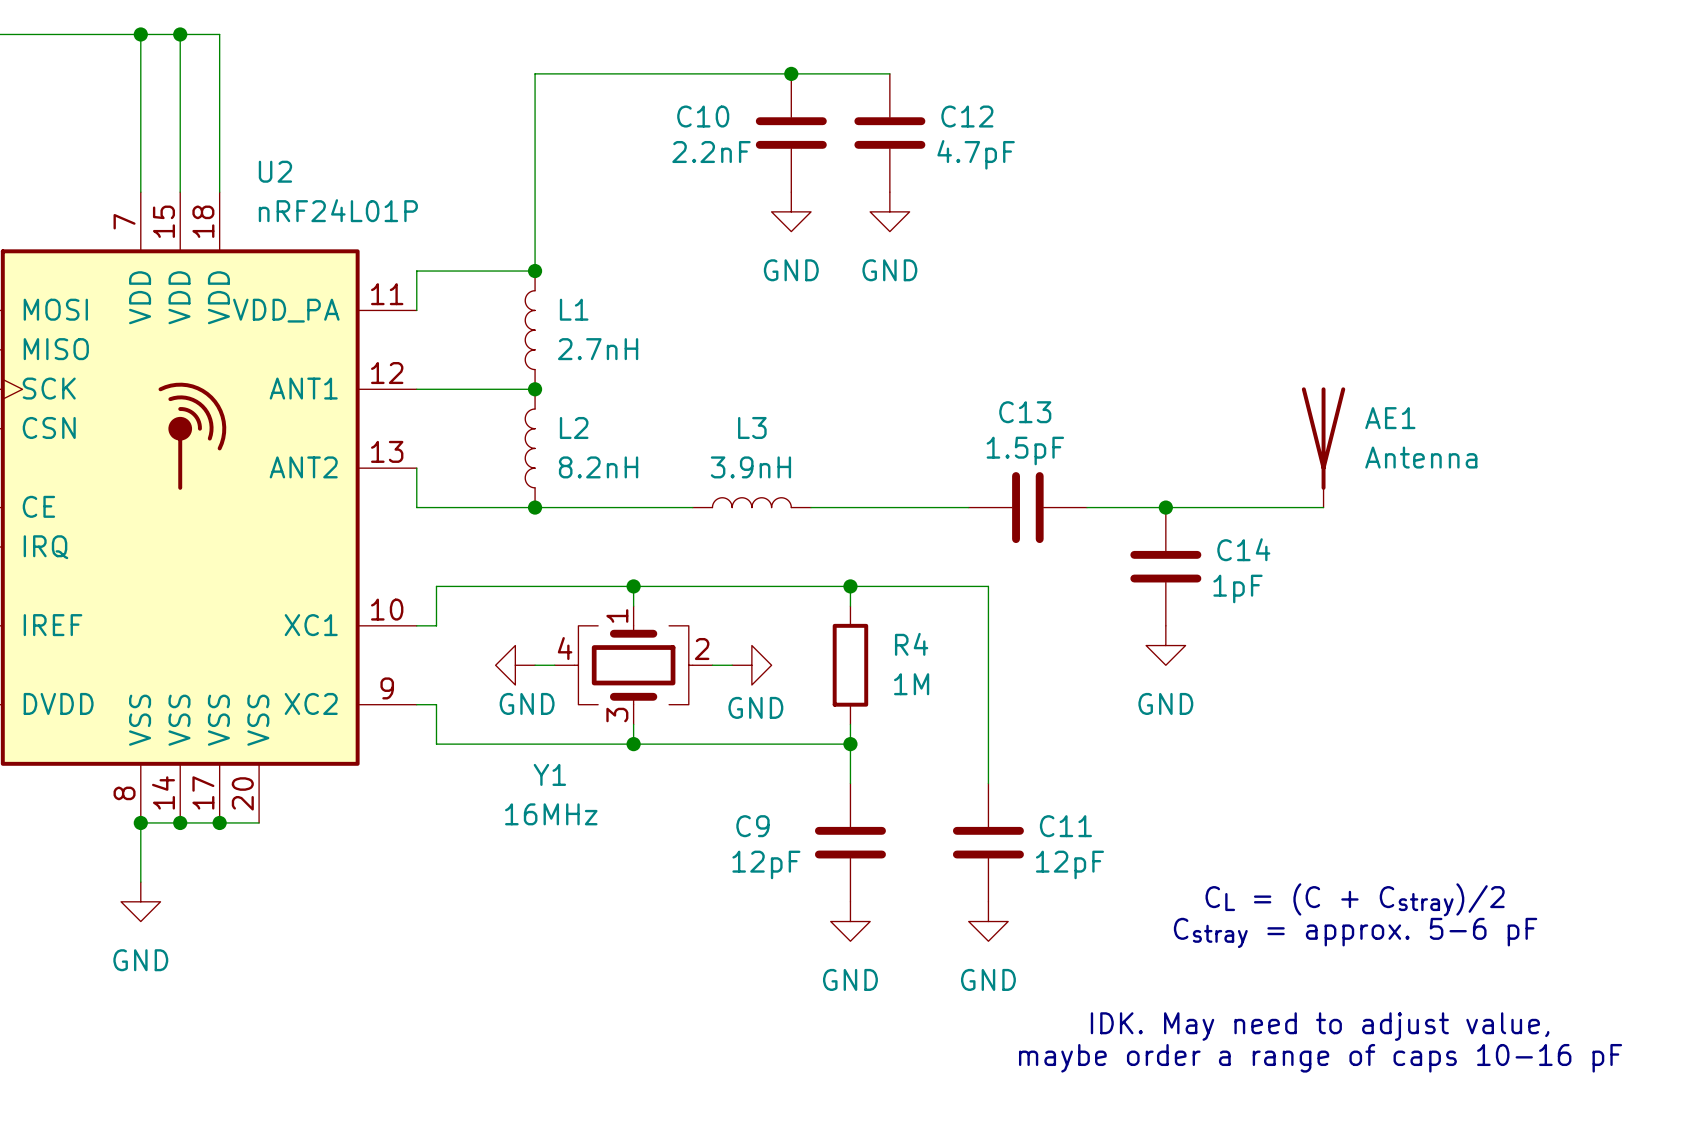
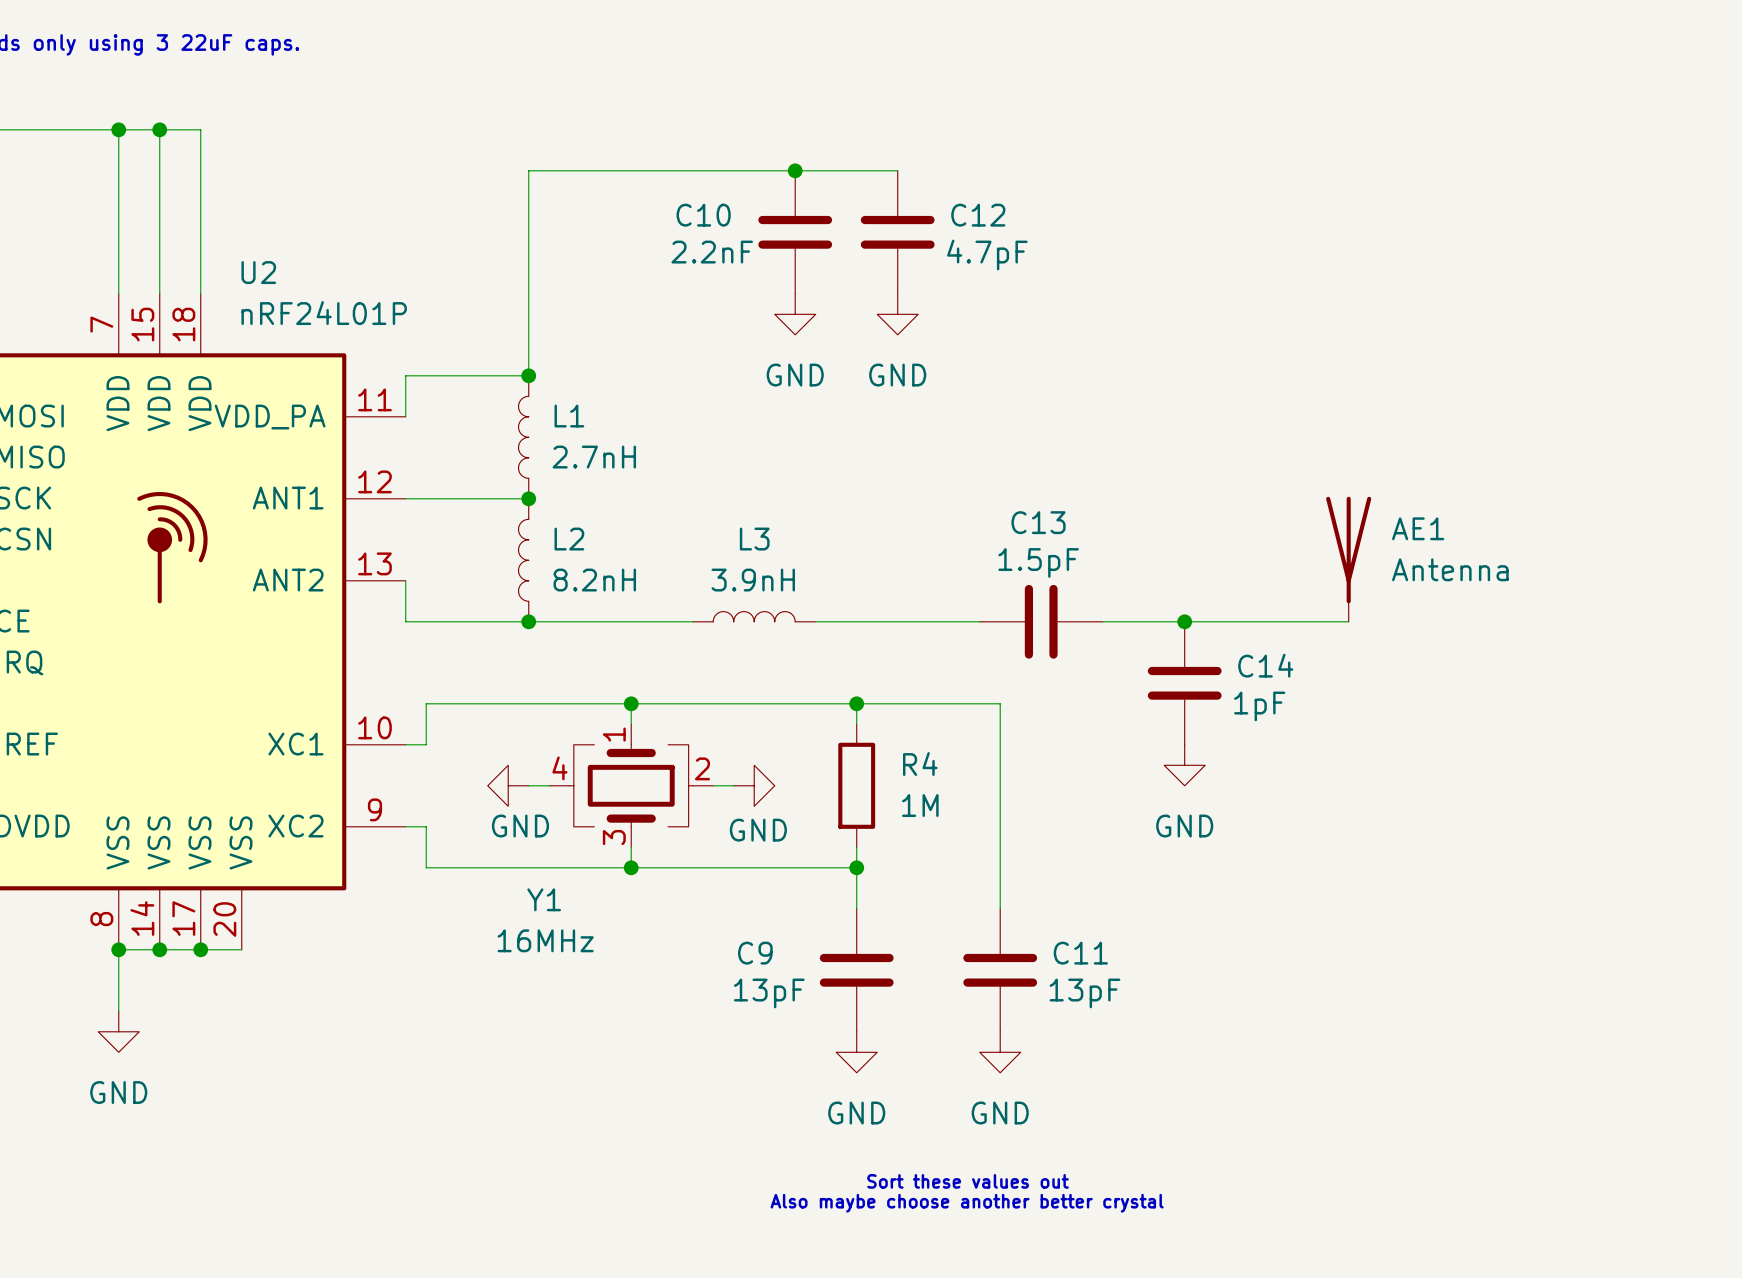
C9 value: 12pF (766, 864) -> 13pF (769, 993)
C11 value: 12pF (1069, 864) -> 13pF (1085, 993)
text: CL = (C + Cstray)/2 (1355, 899) -> none
text: Cstray = approx. 5-6 pF (1355, 932) -> none
text: IDK. May need to adjust value, (1320, 1026) -> none
text: none -> Sort these values out (968, 1181)
text: maybe order a range of caps 10-16 pF (1320, 1058) -> none
text: none -> Also maybe choose another better crystal (967, 1203)

